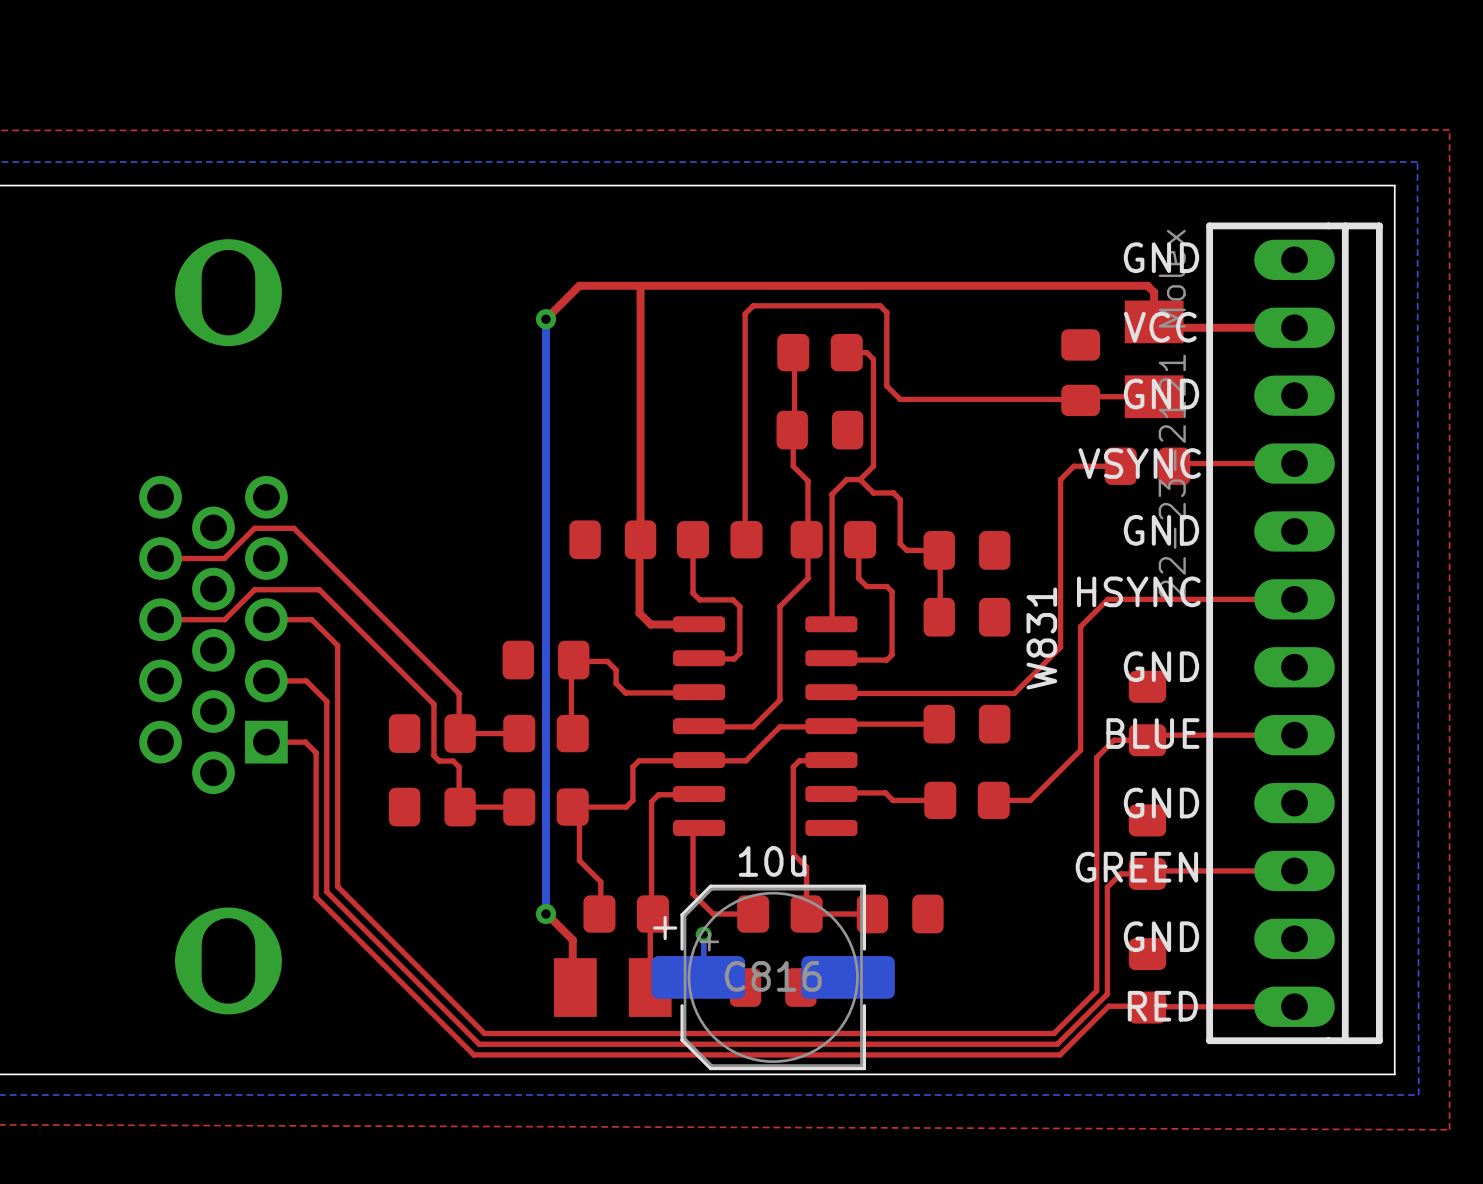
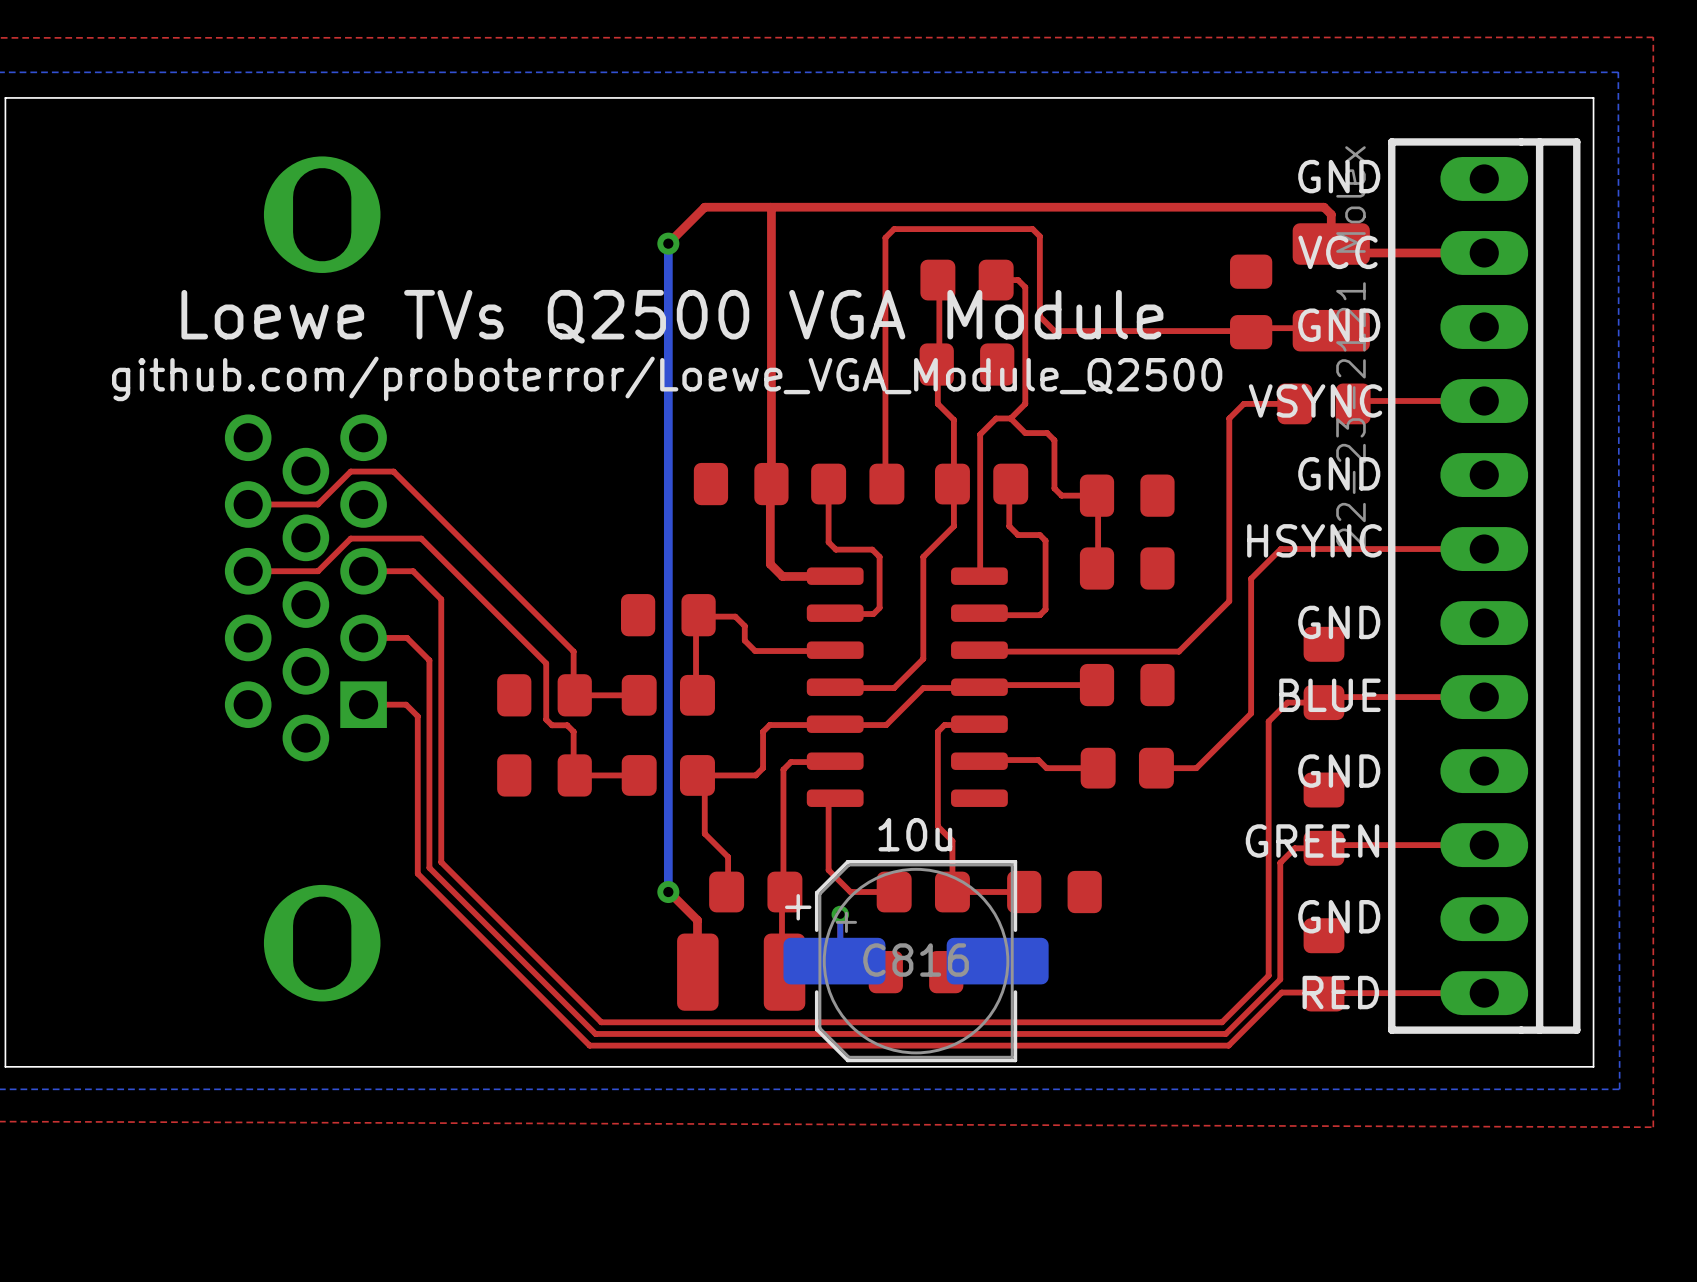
part footprint: [1124, 300, 1184, 419] -> [1292, 223, 1370, 352]
text: none -> Loewe TVs Q2500 VGA Module (672, 316)
text: none -> github.com/proboterror/Loewe_VGA_Module_Q2500 (667, 378)
W831 name: W831 (1041, 638) -> none
part footprint: [554, 958, 672, 1017] -> [677, 933, 806, 1011]

